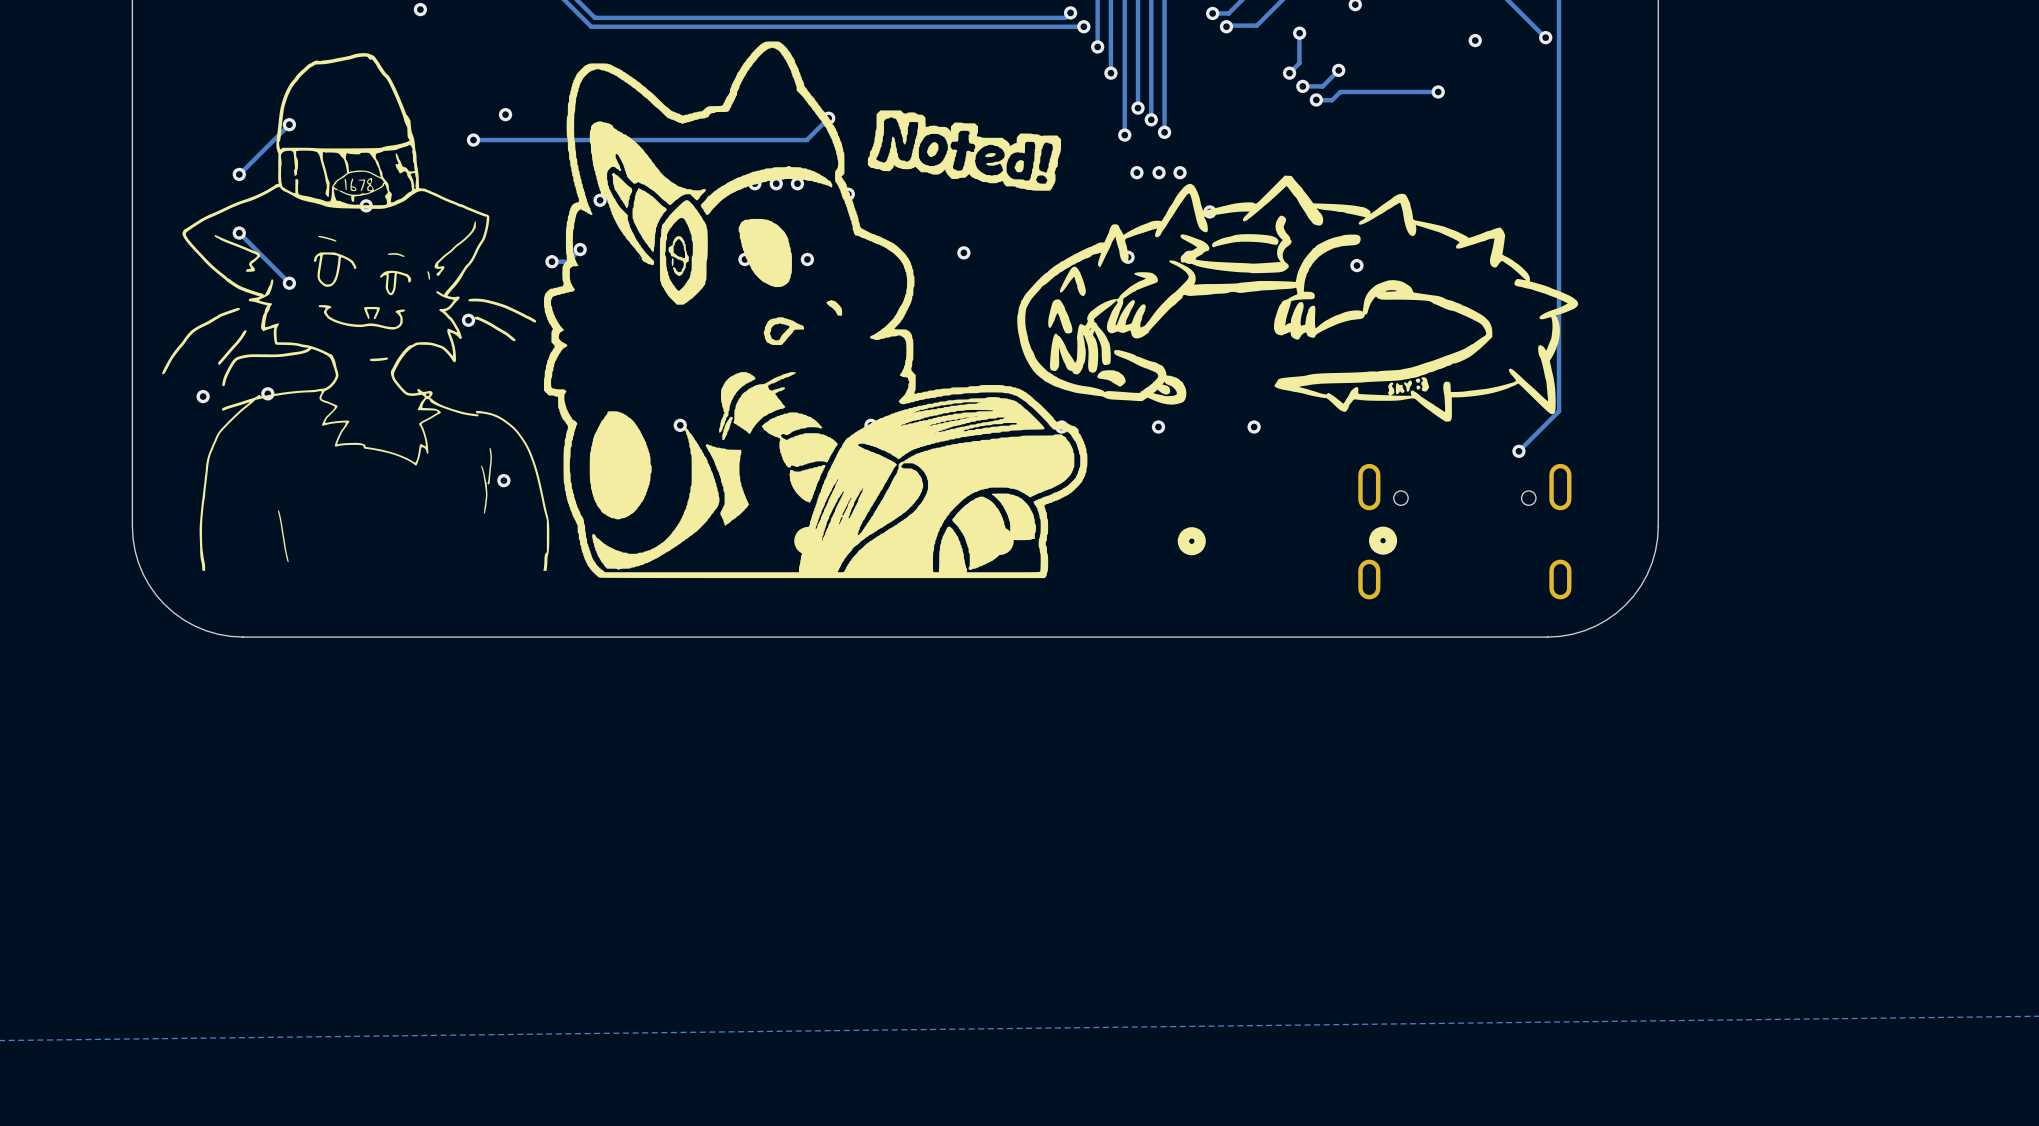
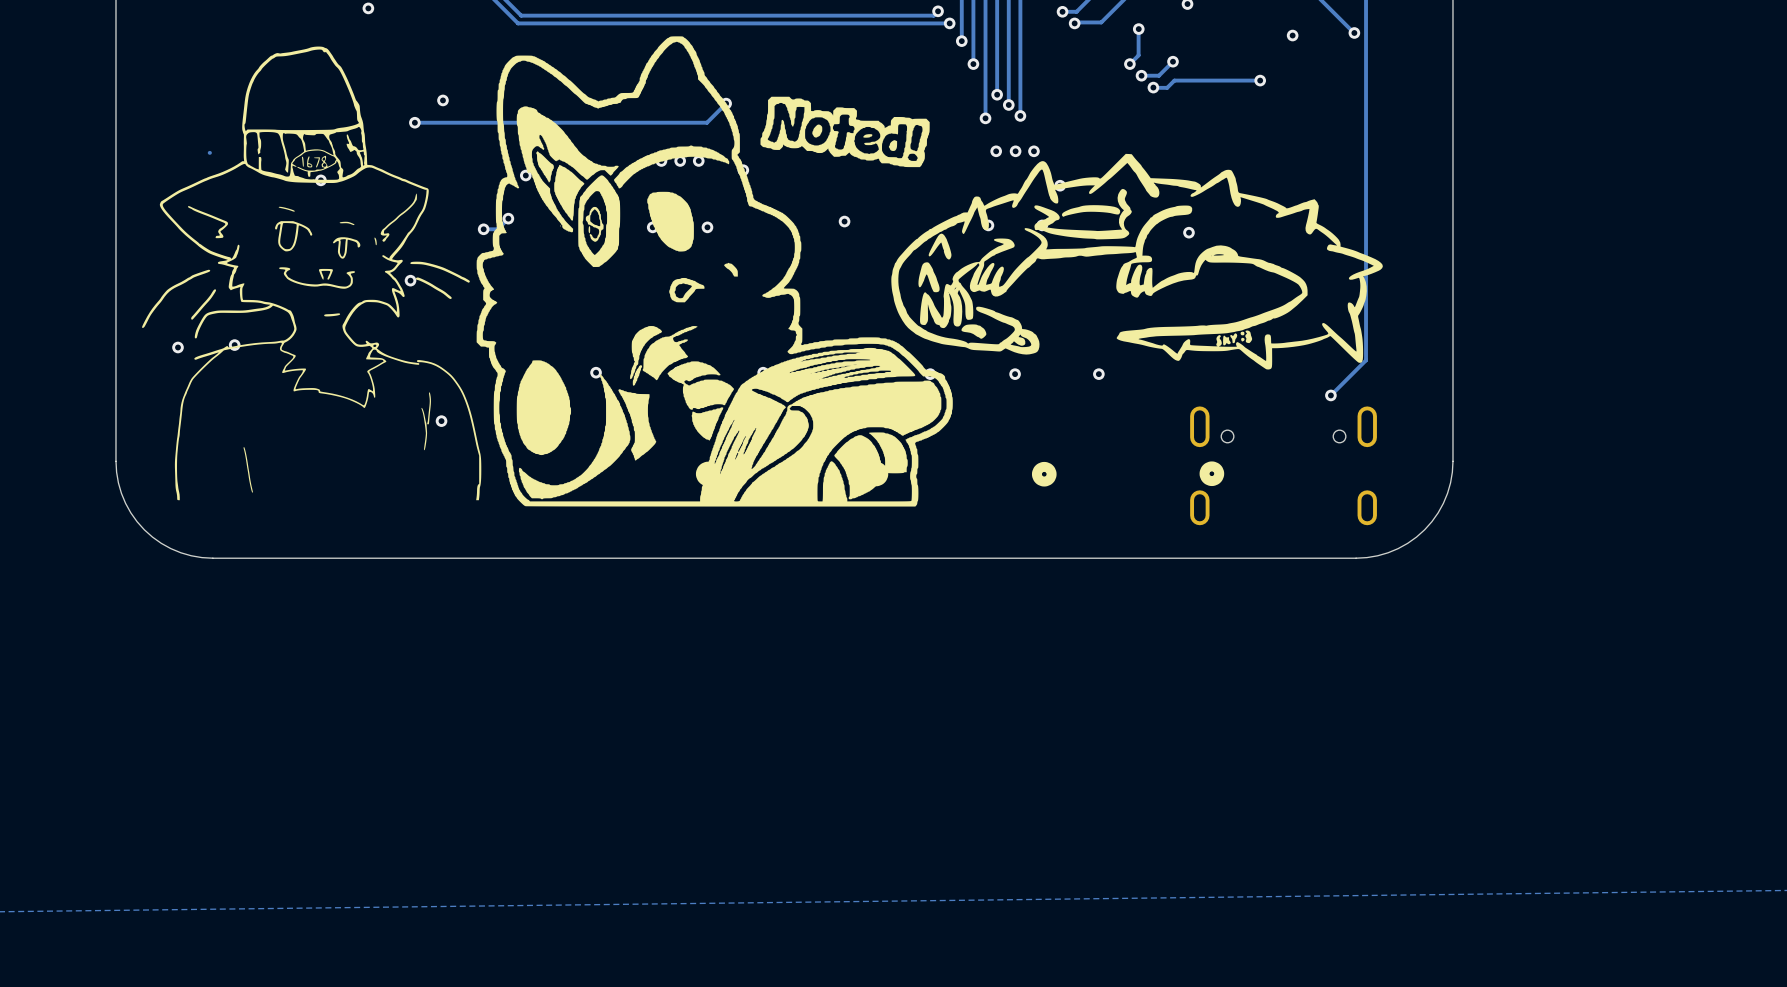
track: (289, 124) (239, 174) -> none
via: (289, 124) -> none
via: (239, 174) -> none
track: (239, 233) (289, 283) -> none
via: (239, 233) -> none
via: (289, 283) -> none

